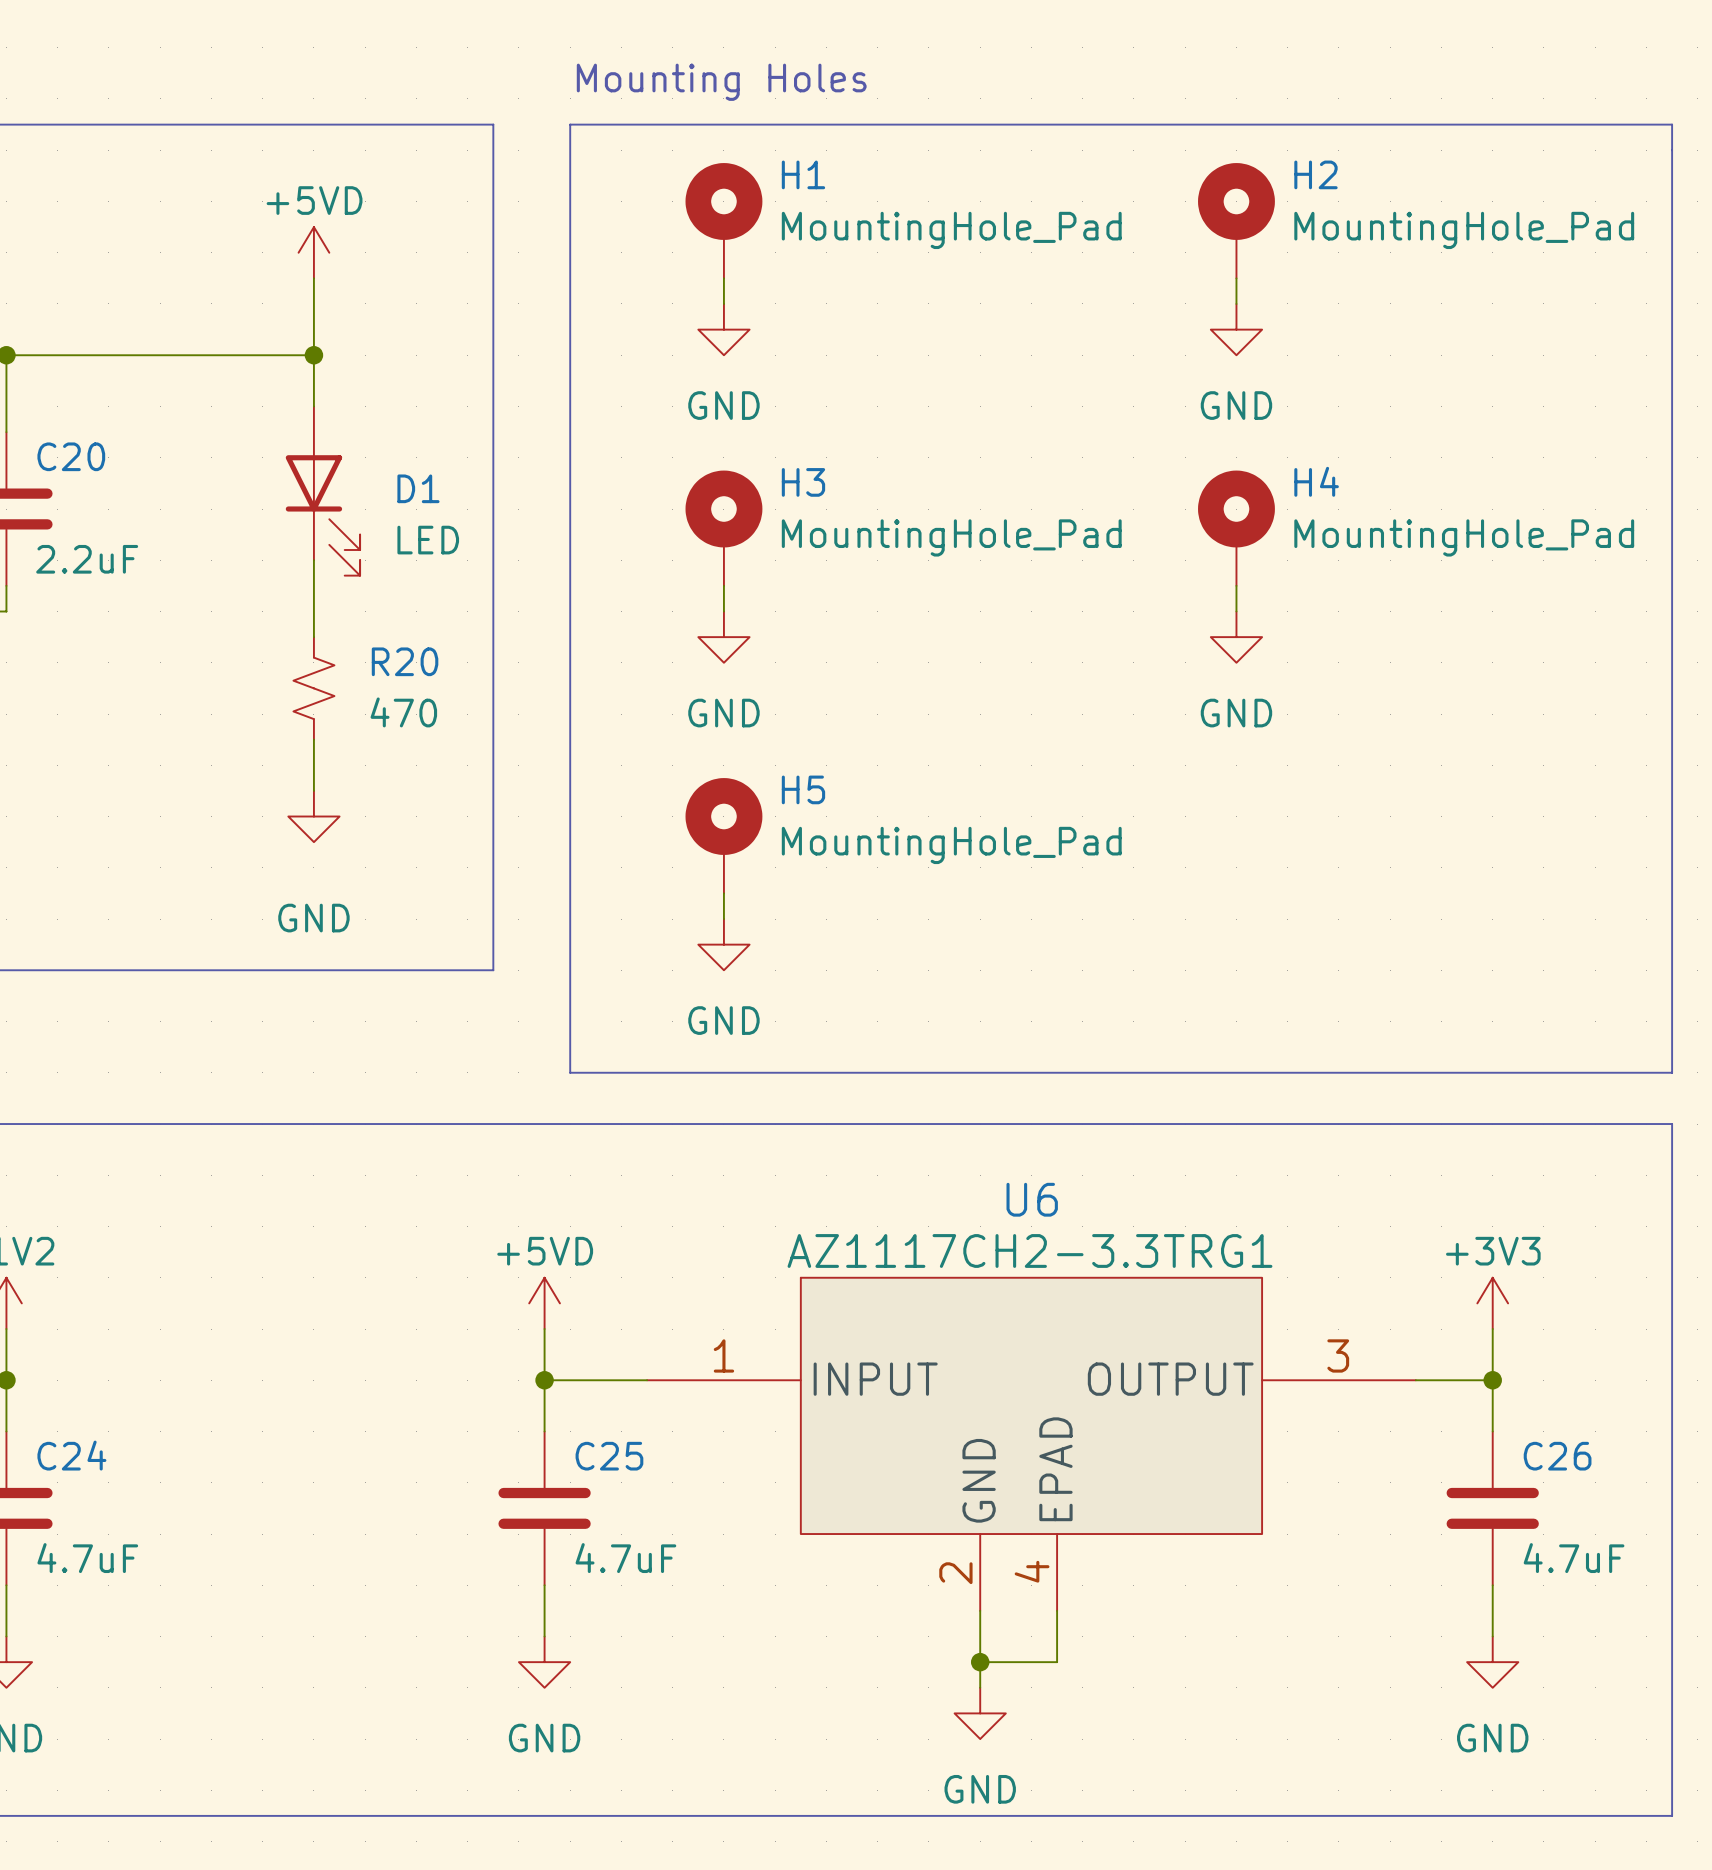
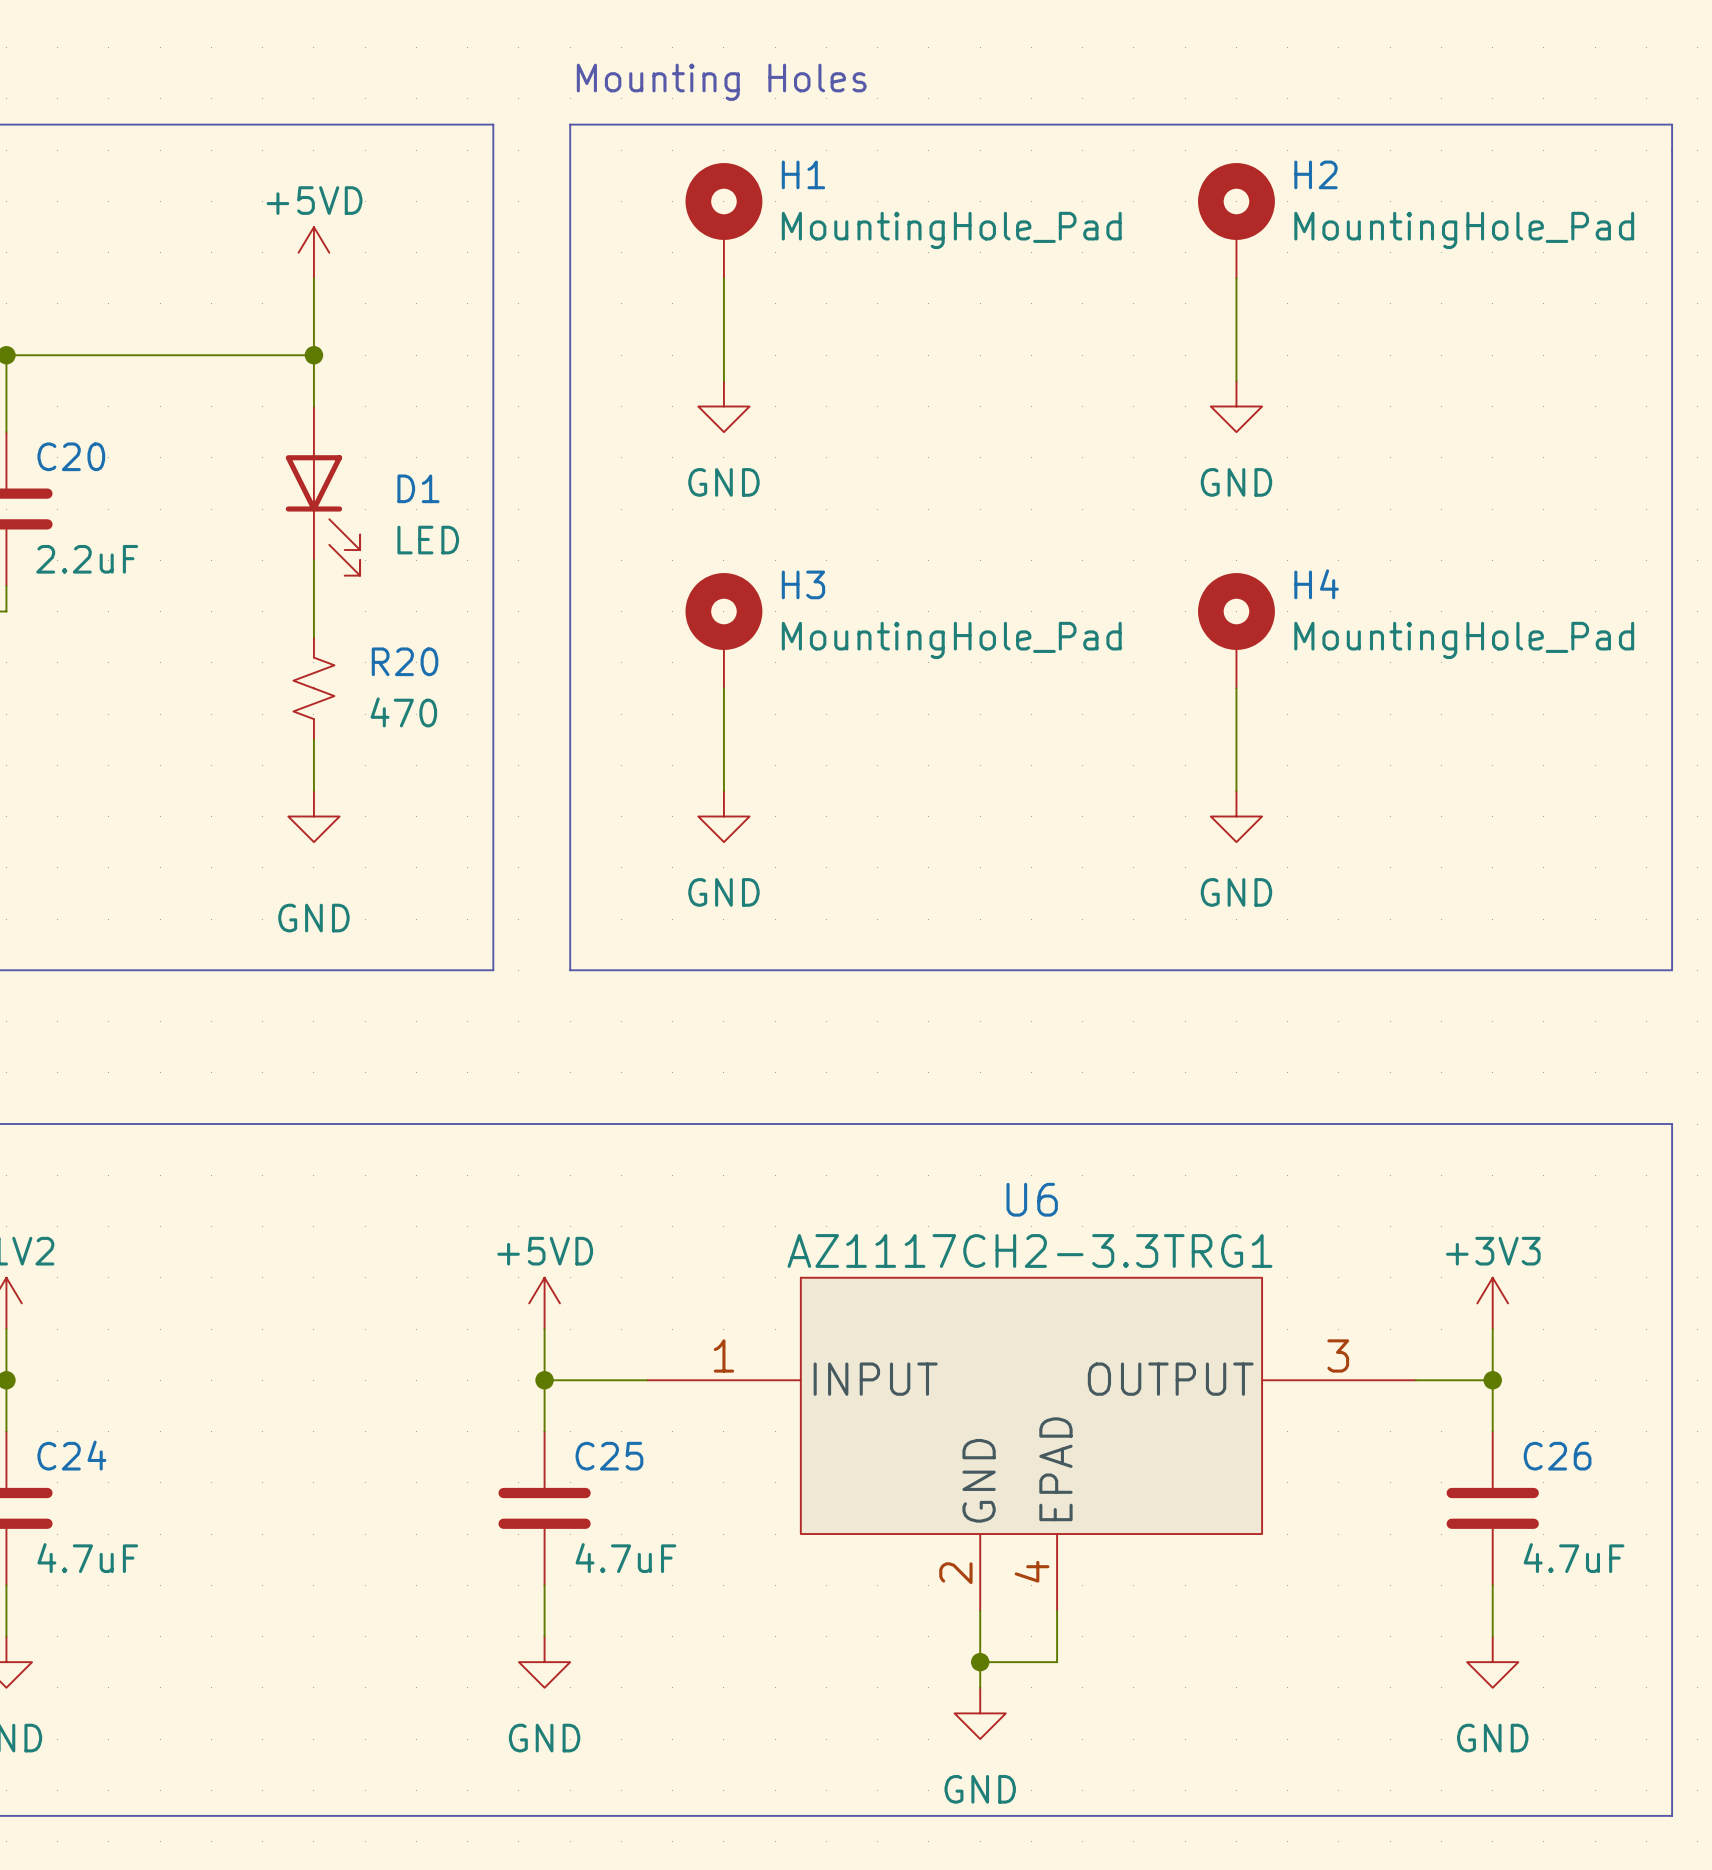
wire: none -> (723, 303) (723, 380)
wire: none -> (1236, 303) (1236, 380)
power symbol position: GND (723, 329) -> GND (723, 406)
power symbol position: GND (1236, 329) -> GND (1236, 406)
H3 position: (723, 528) -> (723, 630)
H4 position: (1236, 528) -> (1236, 630)
wire: (723, 585) (723, 611) -> none
wire: (1236, 585) (1236, 611) -> none
power symbol: GND (723, 637) -> none
power symbol: GND (1236, 637) -> none
wire: none -> (723, 688) (723, 790)
wire: none -> (1236, 688) (1236, 790)
power symbol: none -> GND (723, 816)
power symbol: none -> GND (1236, 816)
H5: MountingHole_Pad (723, 835) -> none
wire: (723, 893) (723, 919) -> none
power symbol: GND (723, 944) -> none
line: (570, 970) (570, 1072) (1672, 1072) (1672, 970) -> (570, 970) (1672, 970)

